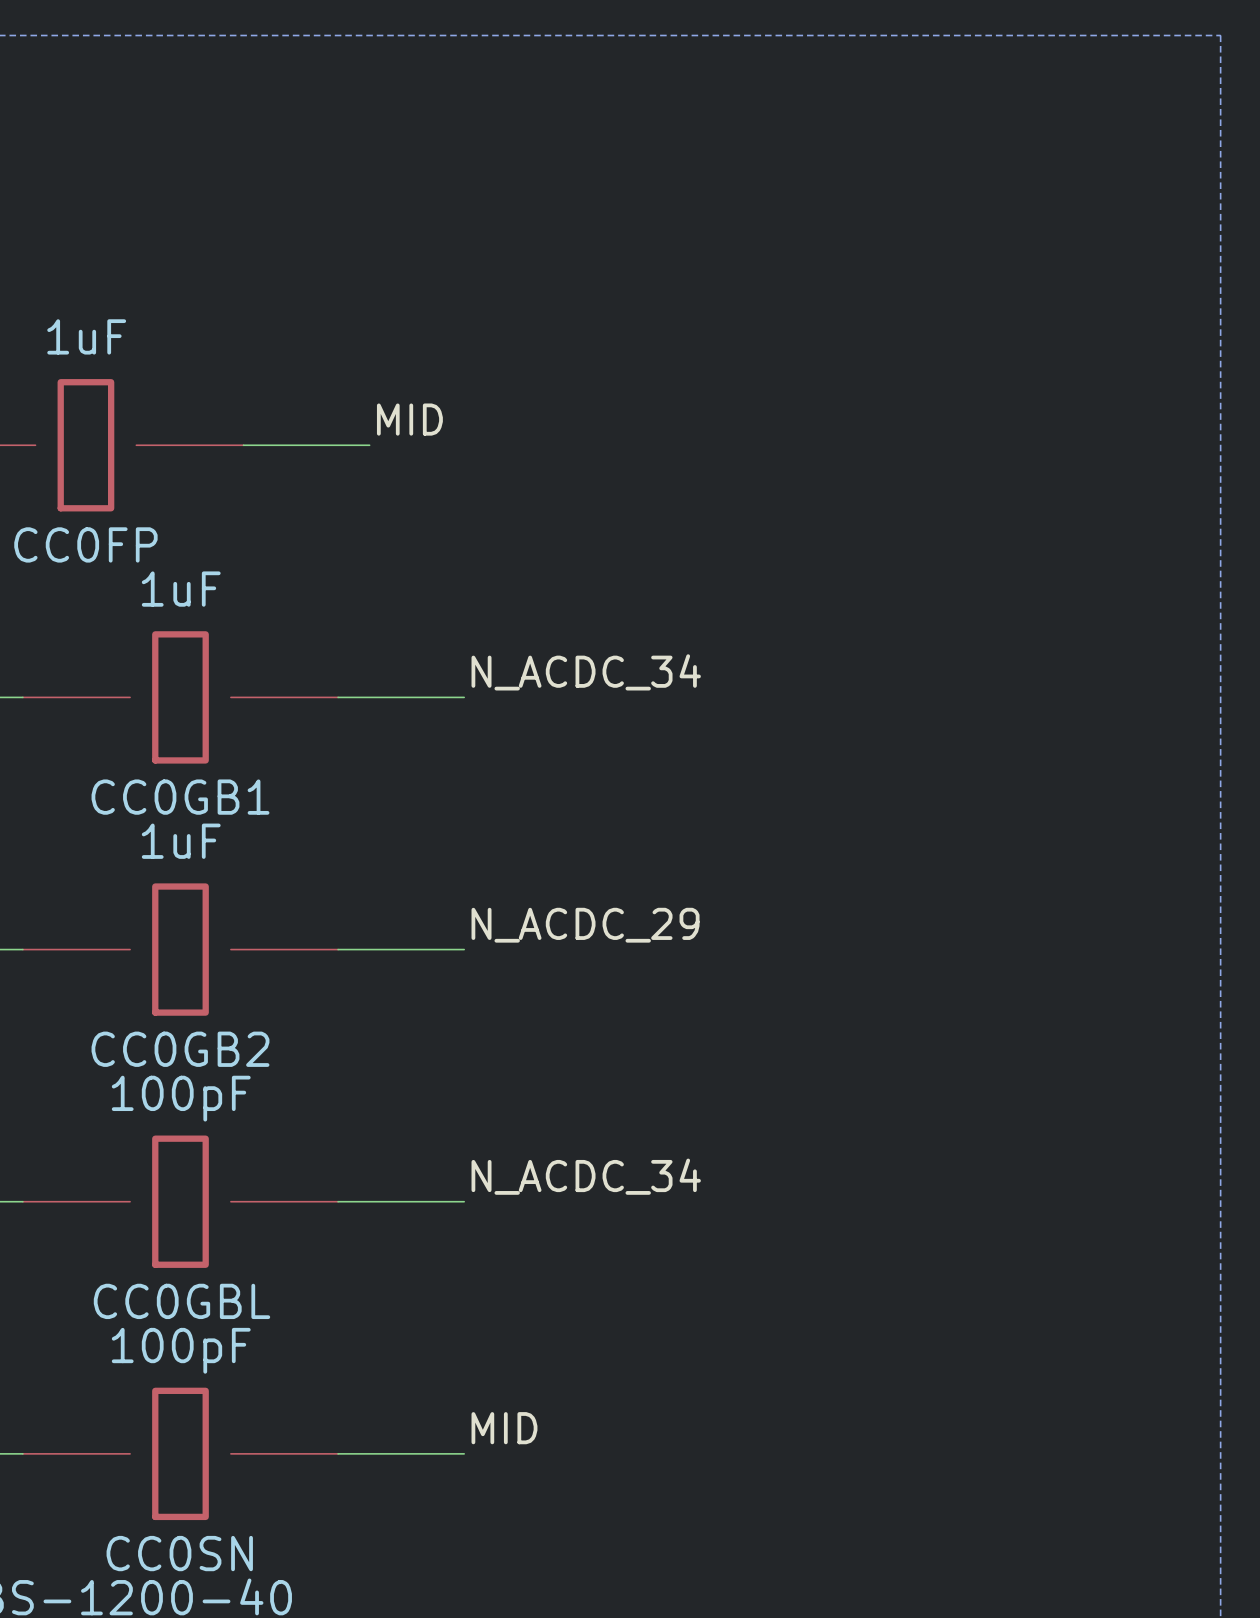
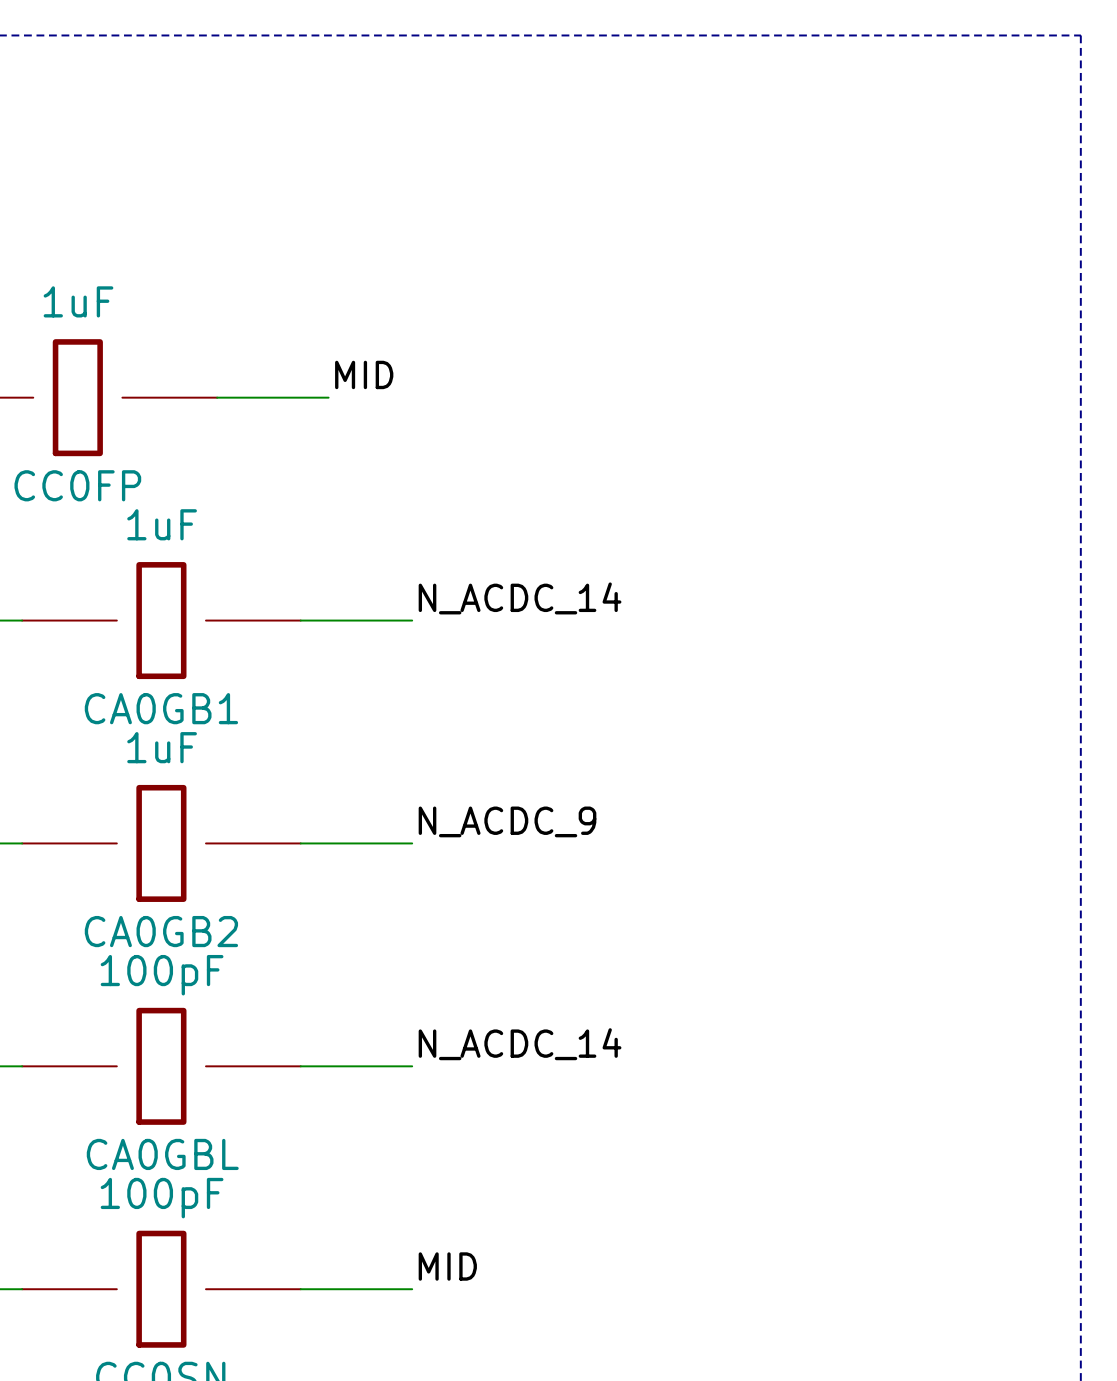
label: N_ACDC_34 (586, 672) -> N_ACDC_14 (520, 598)
CC0GB1 name: CC0GB1 (180, 797) -> CA0GB1 (161, 708)
label: N_ACDC_29 (585, 925) -> N_ACDC_9 (507, 821)
CC0GB2 name: CC0GB2 (180, 1049) -> CA0GB2 (161, 931)
label: N_ACDC_34 (586, 1176) -> N_ACDC_14 (520, 1044)
CC0GBL name: CC0GBL (181, 1301) -> CA0GBL (162, 1154)

